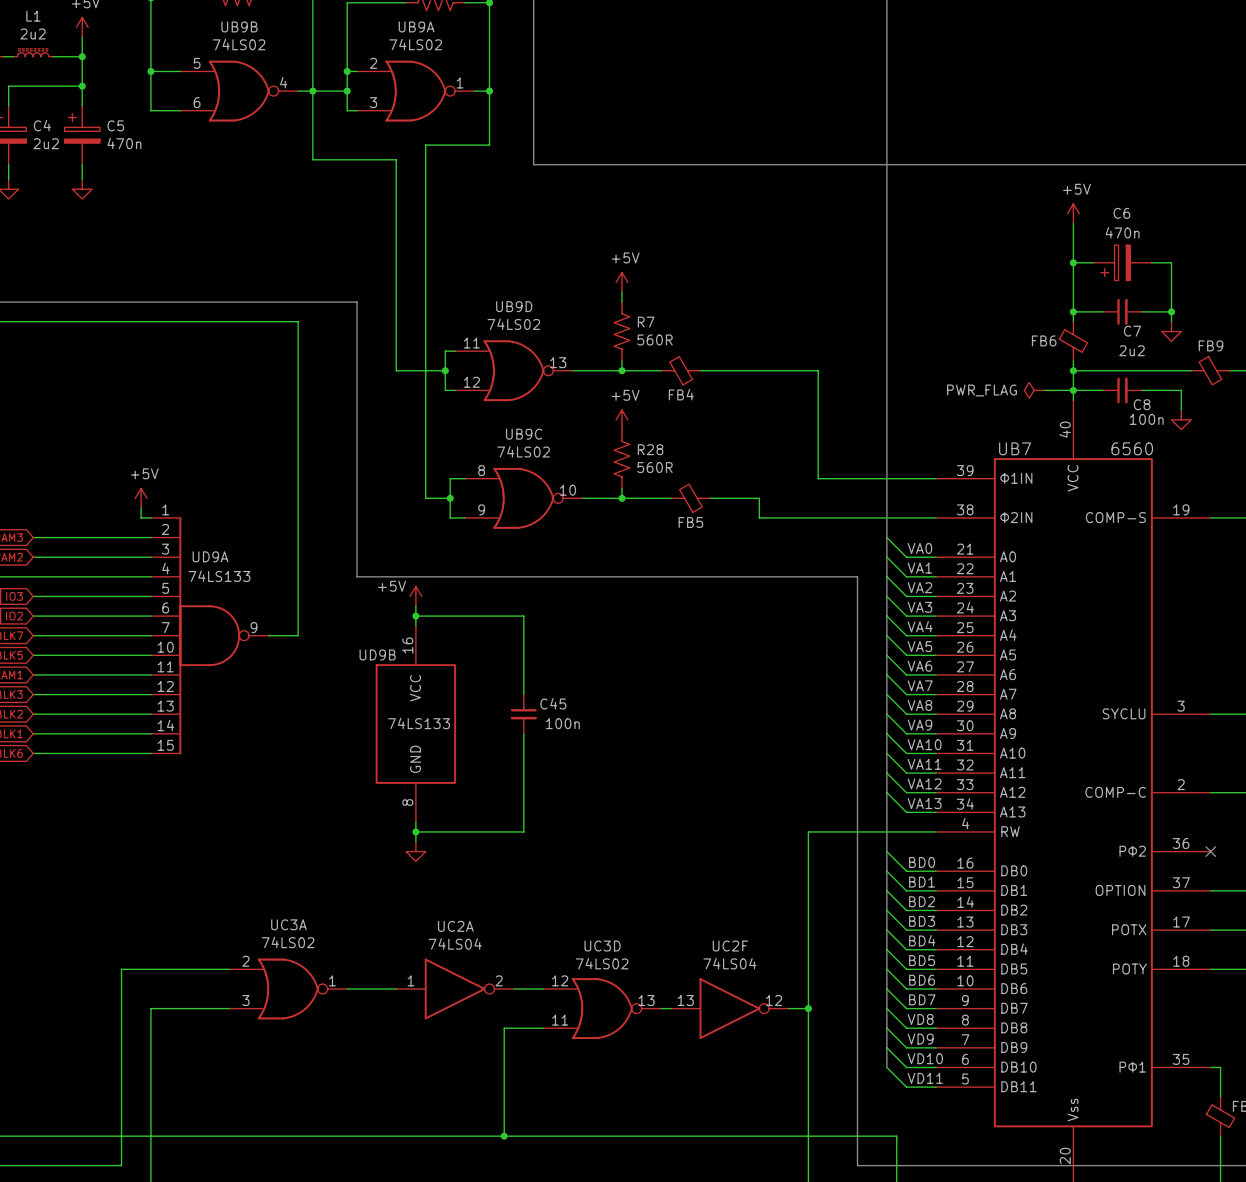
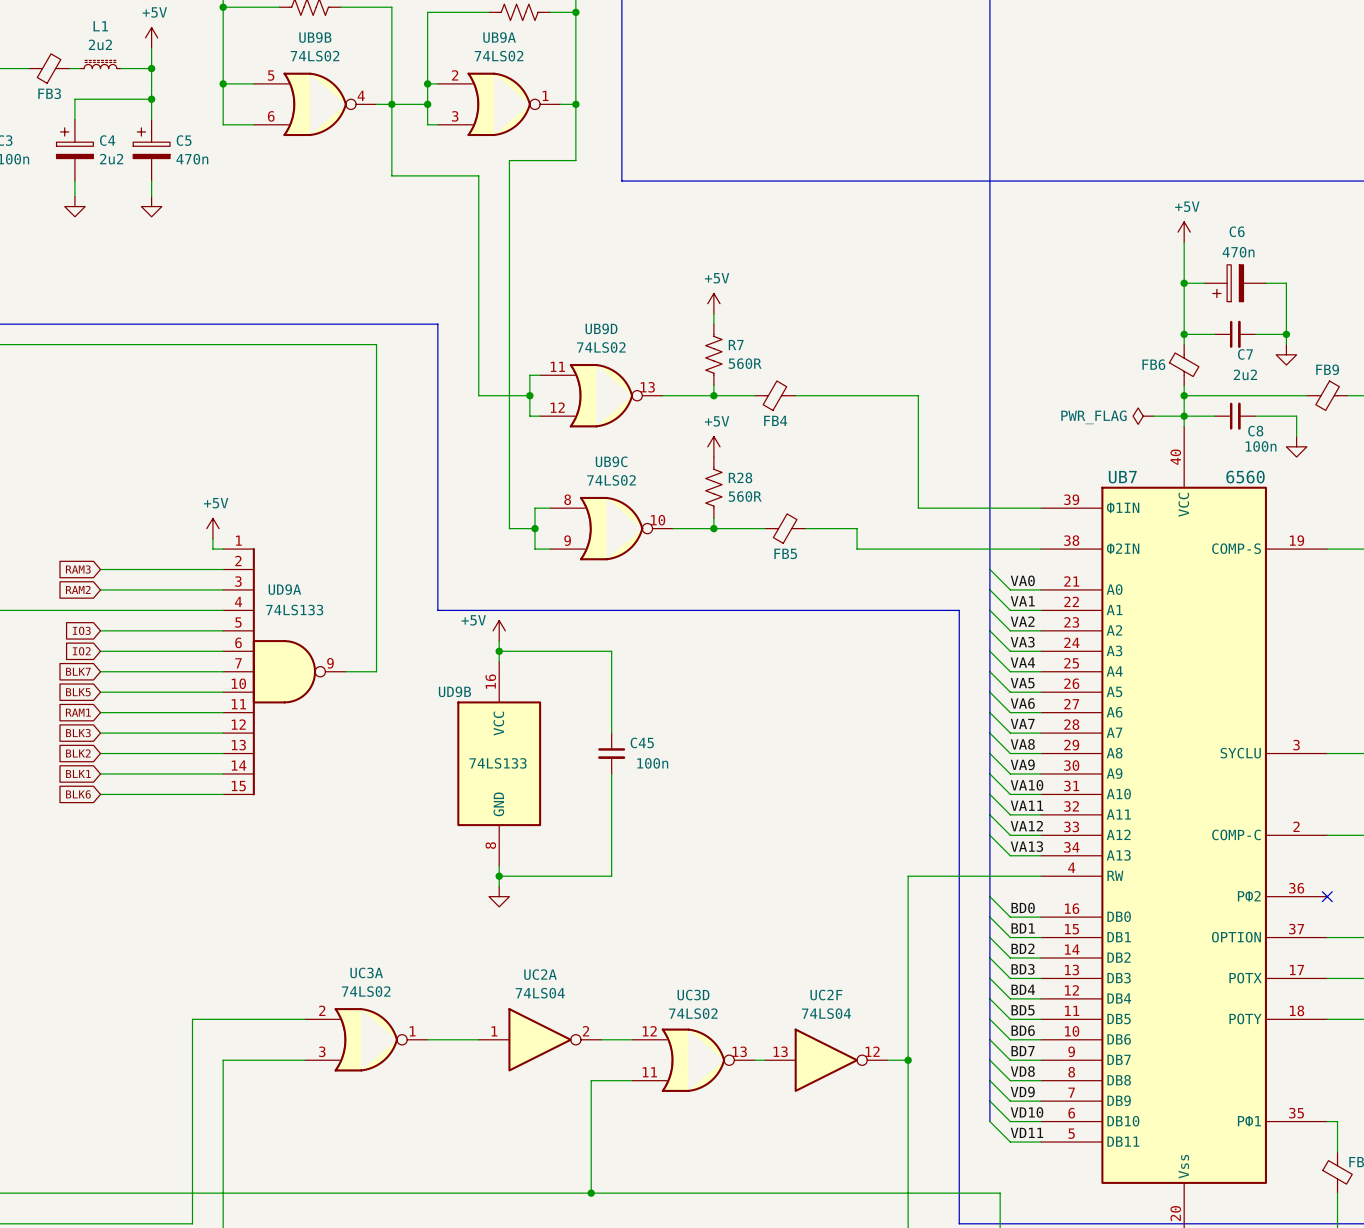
FB4 flip: as is (681, 370) -> left-right (774, 395)
FB9 flip: as is (1210, 370) -> left-right (1327, 395)
FB5 flip: as is (690, 498) -> left-right (785, 528)

